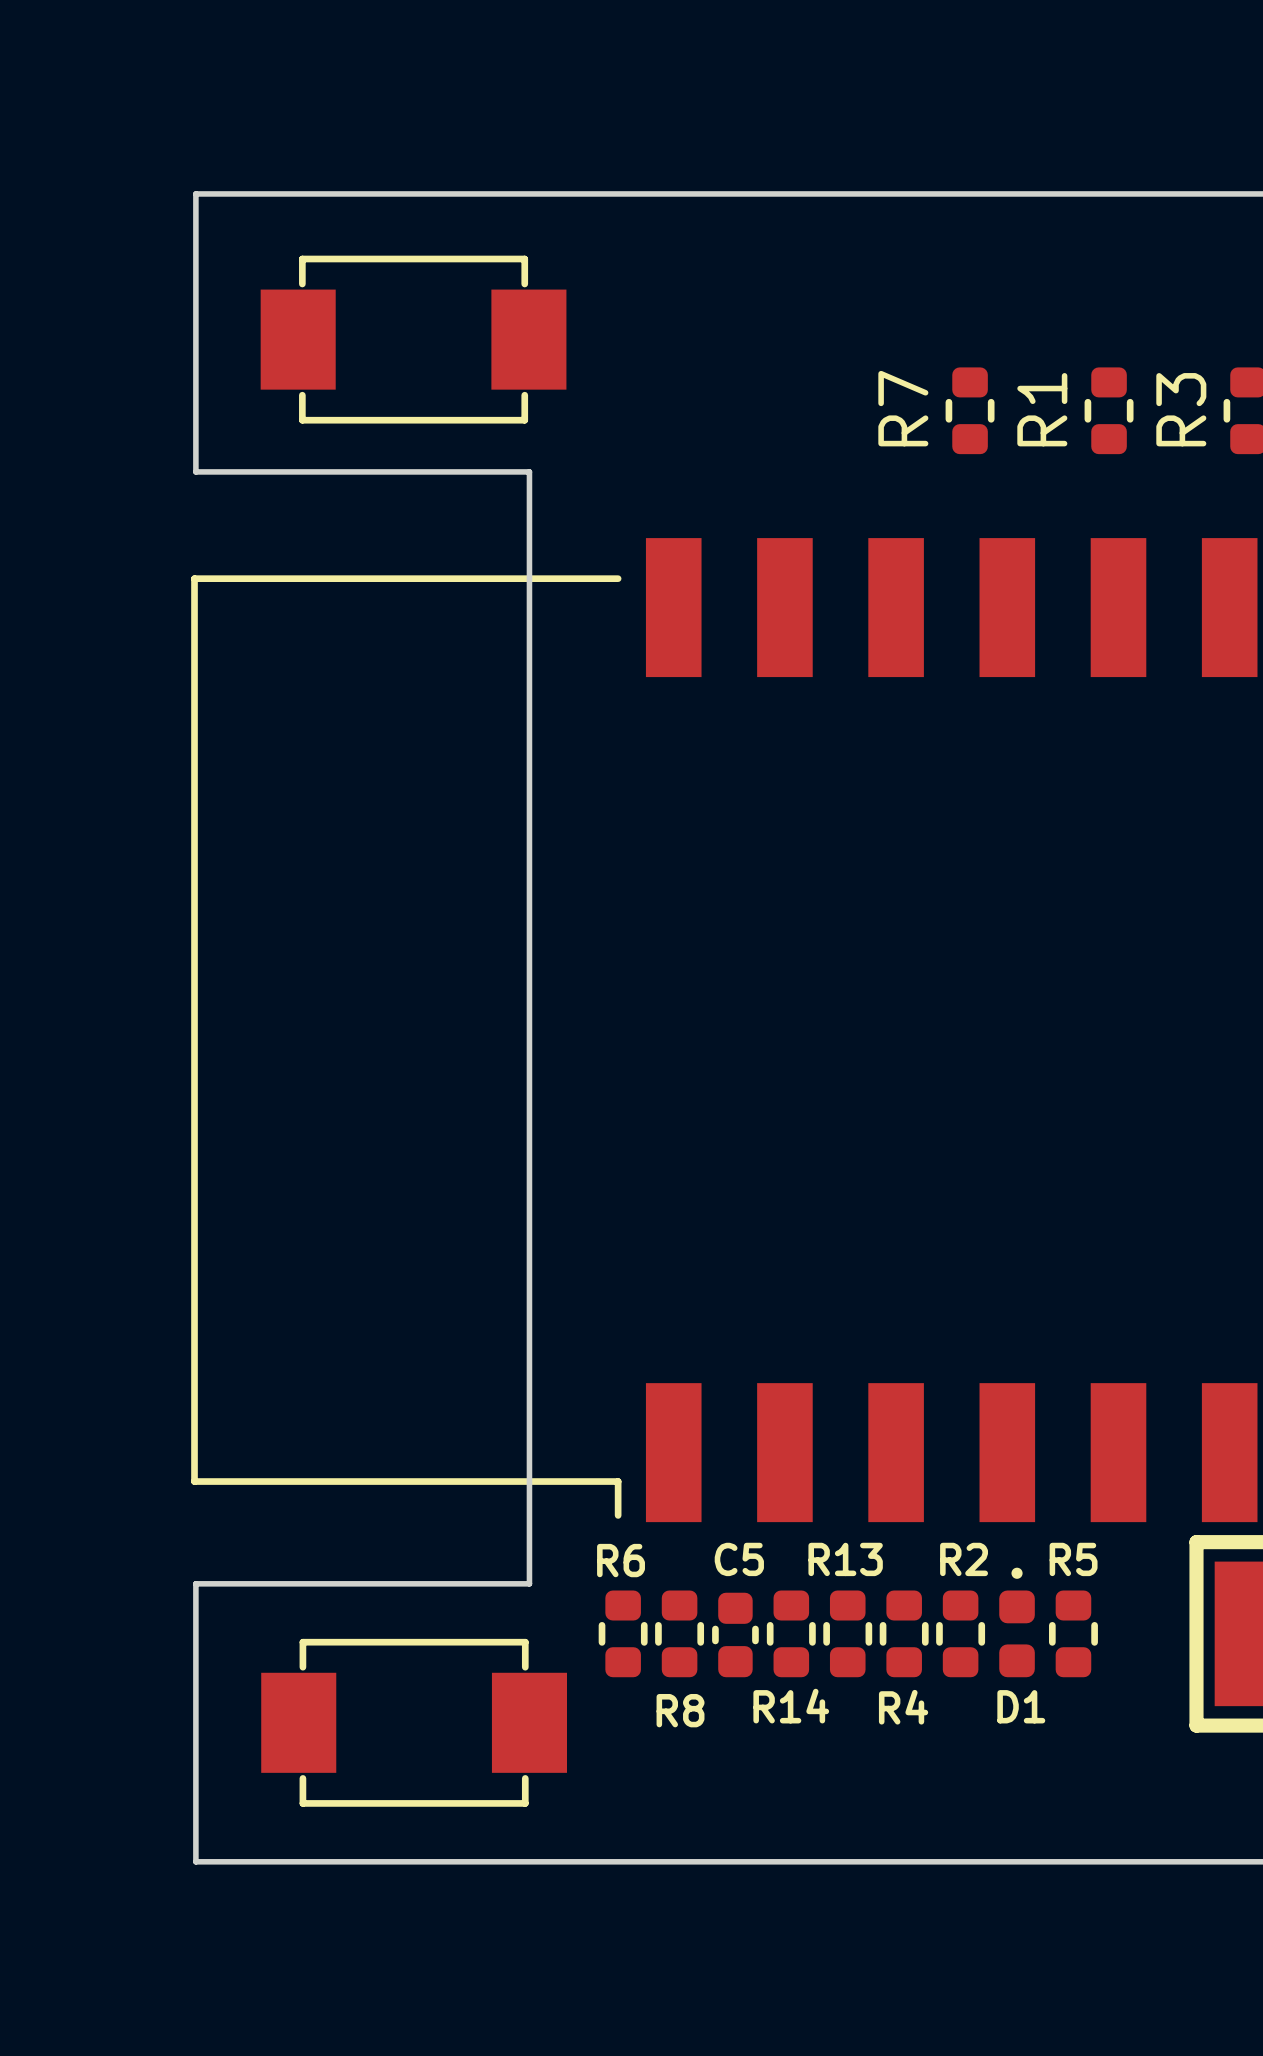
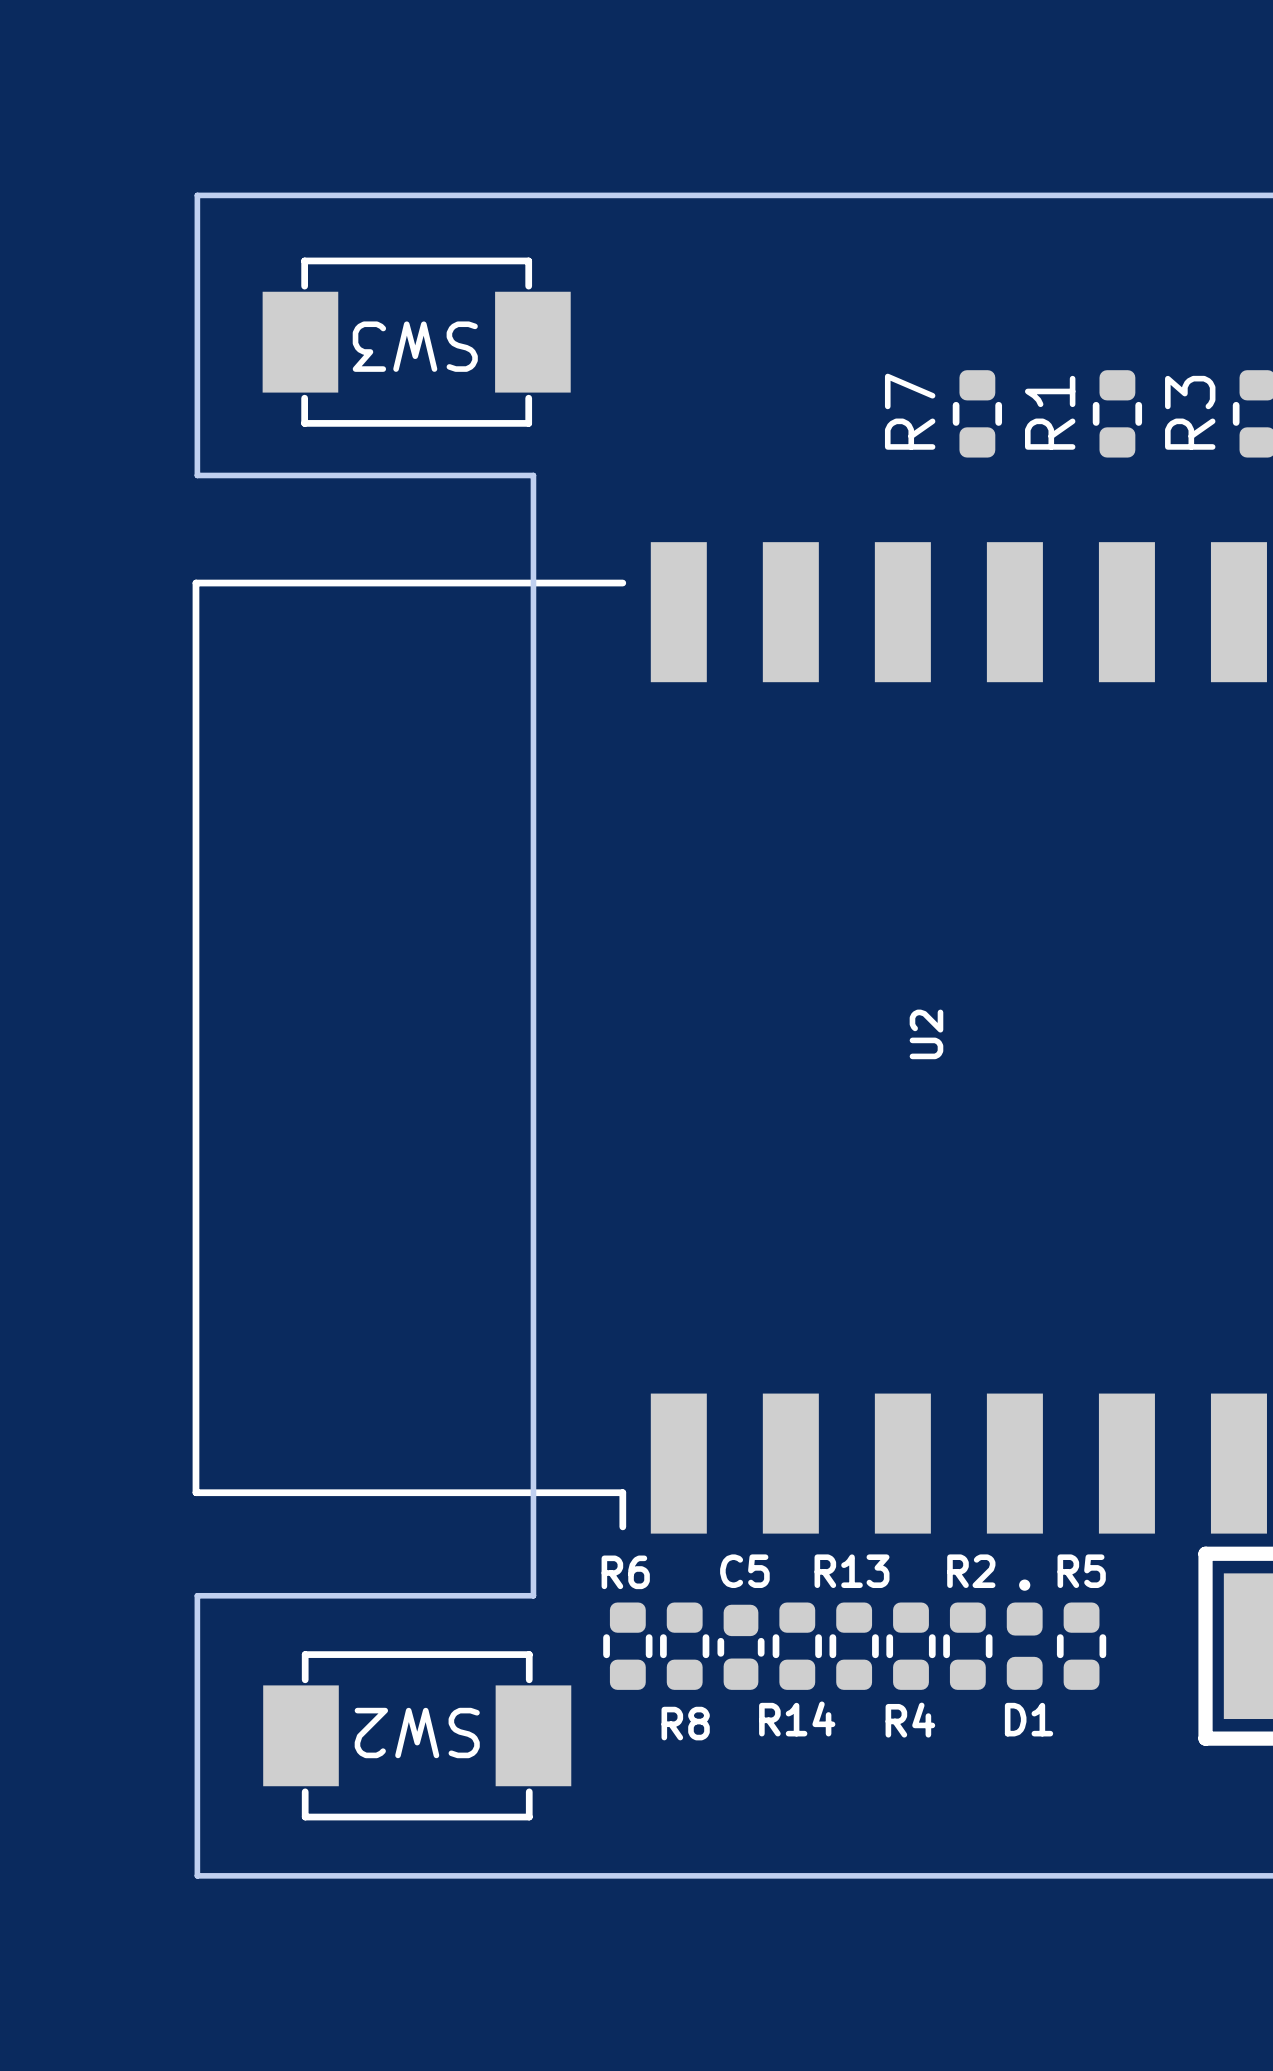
SW3 name: none -> SW3 (415, 346)
U2 name: none -> U2 (926, 1034)
SW2 name: none -> SW2 (417, 1733)

